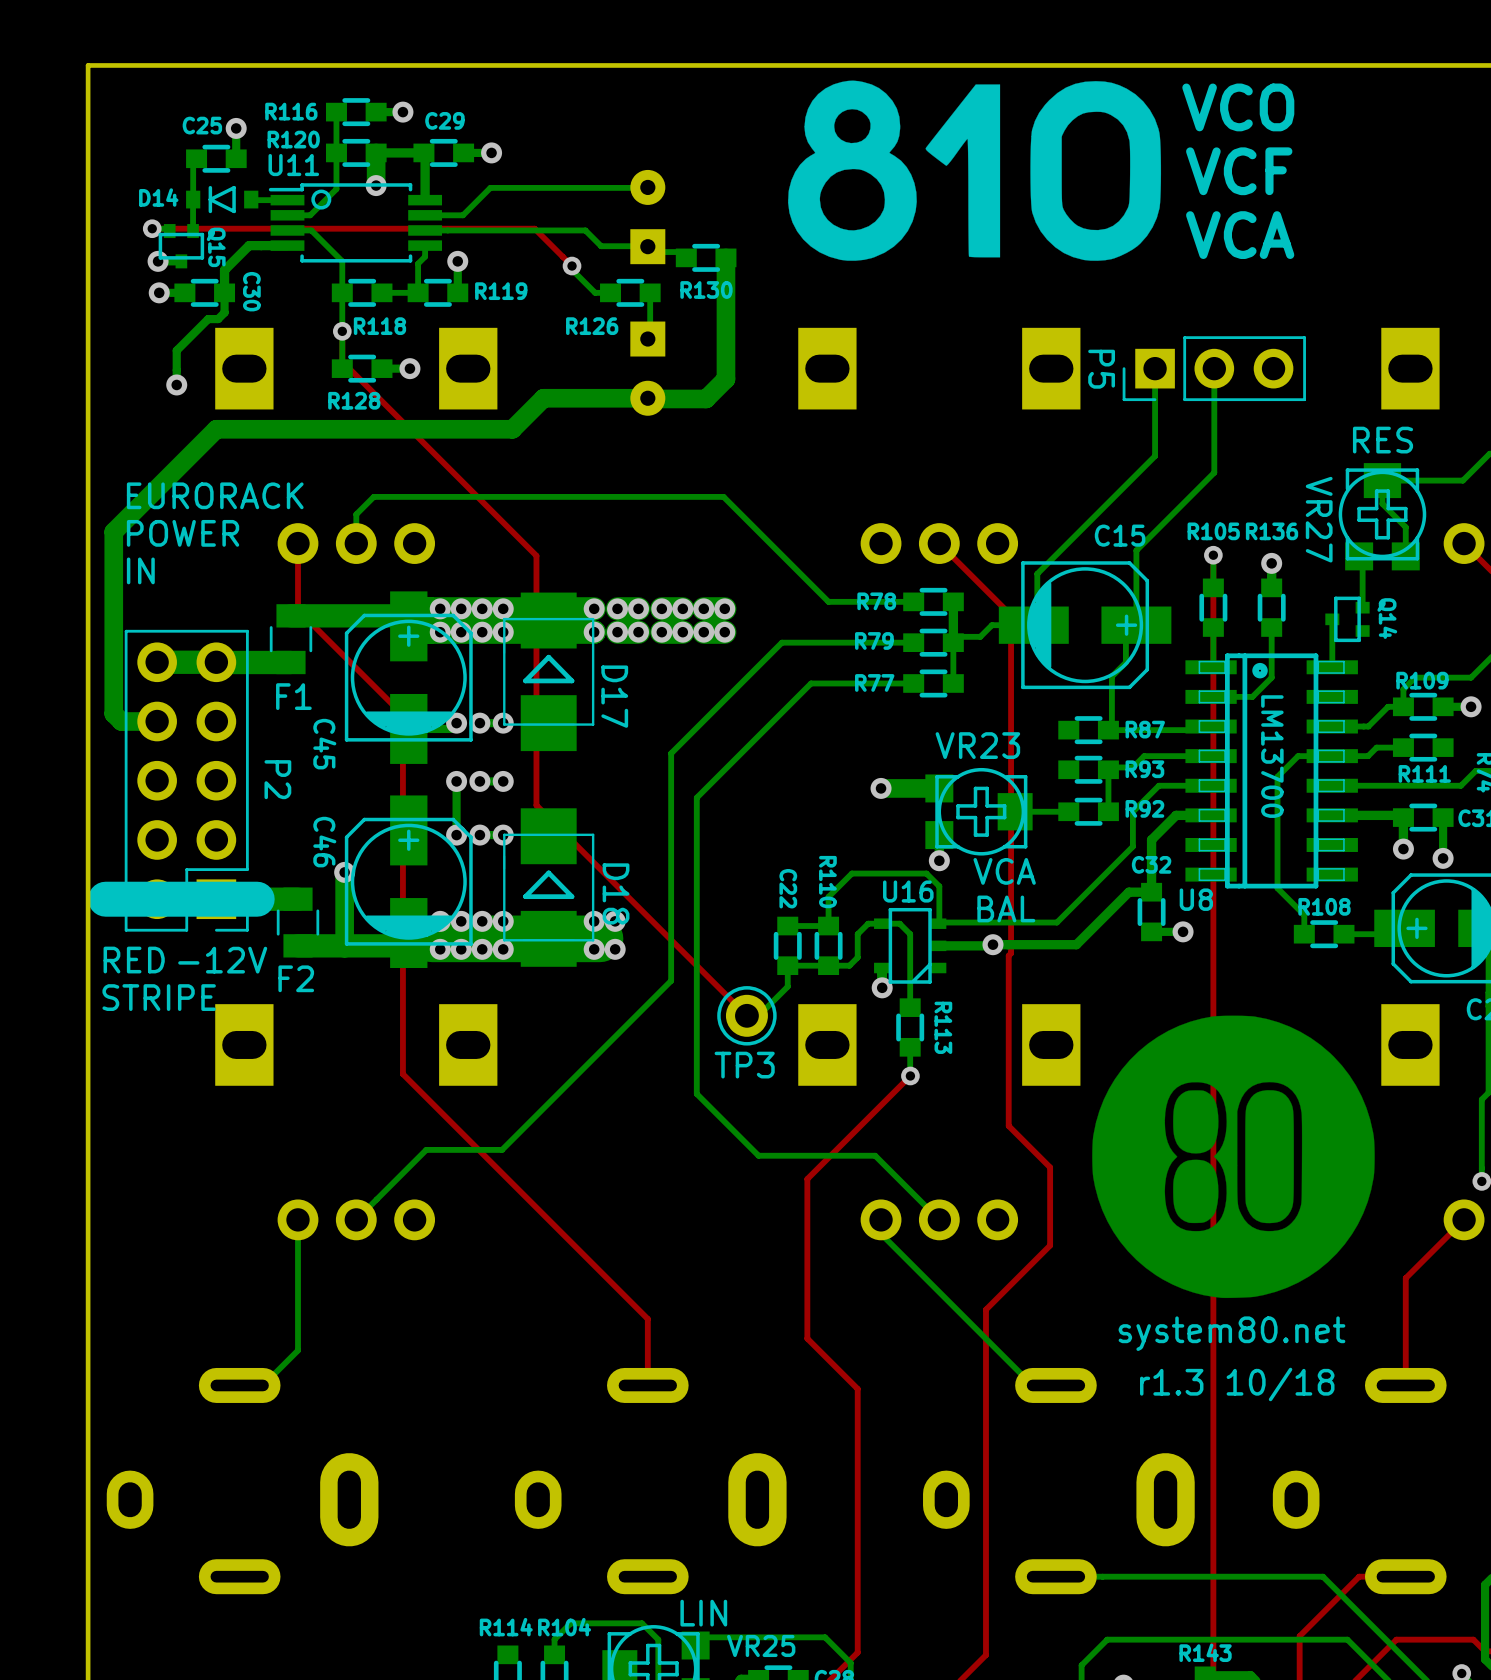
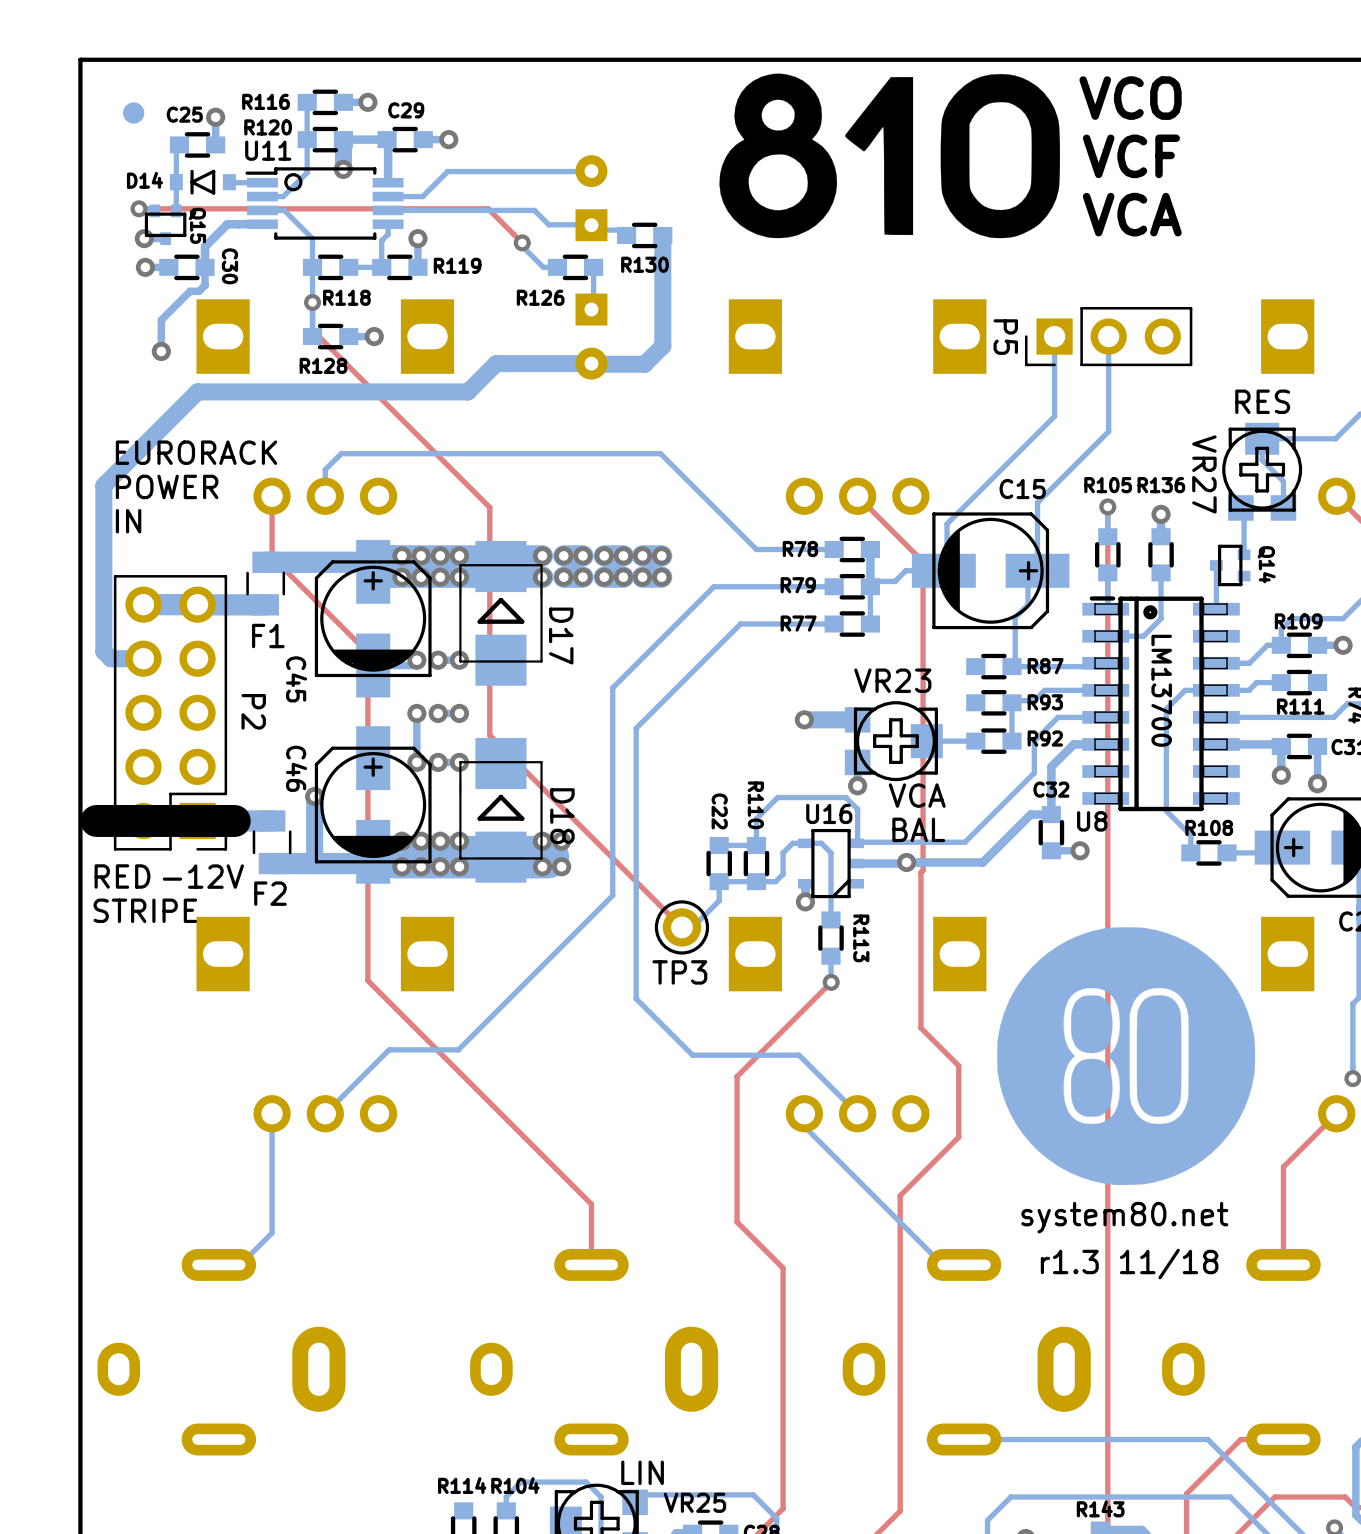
part: none -> (133, 113)
line: none -> (1113, 598) (1091, 598)
text: r1.3 10/18 (1237, 1384) -> r1.3 11/18 (1129, 1264)

